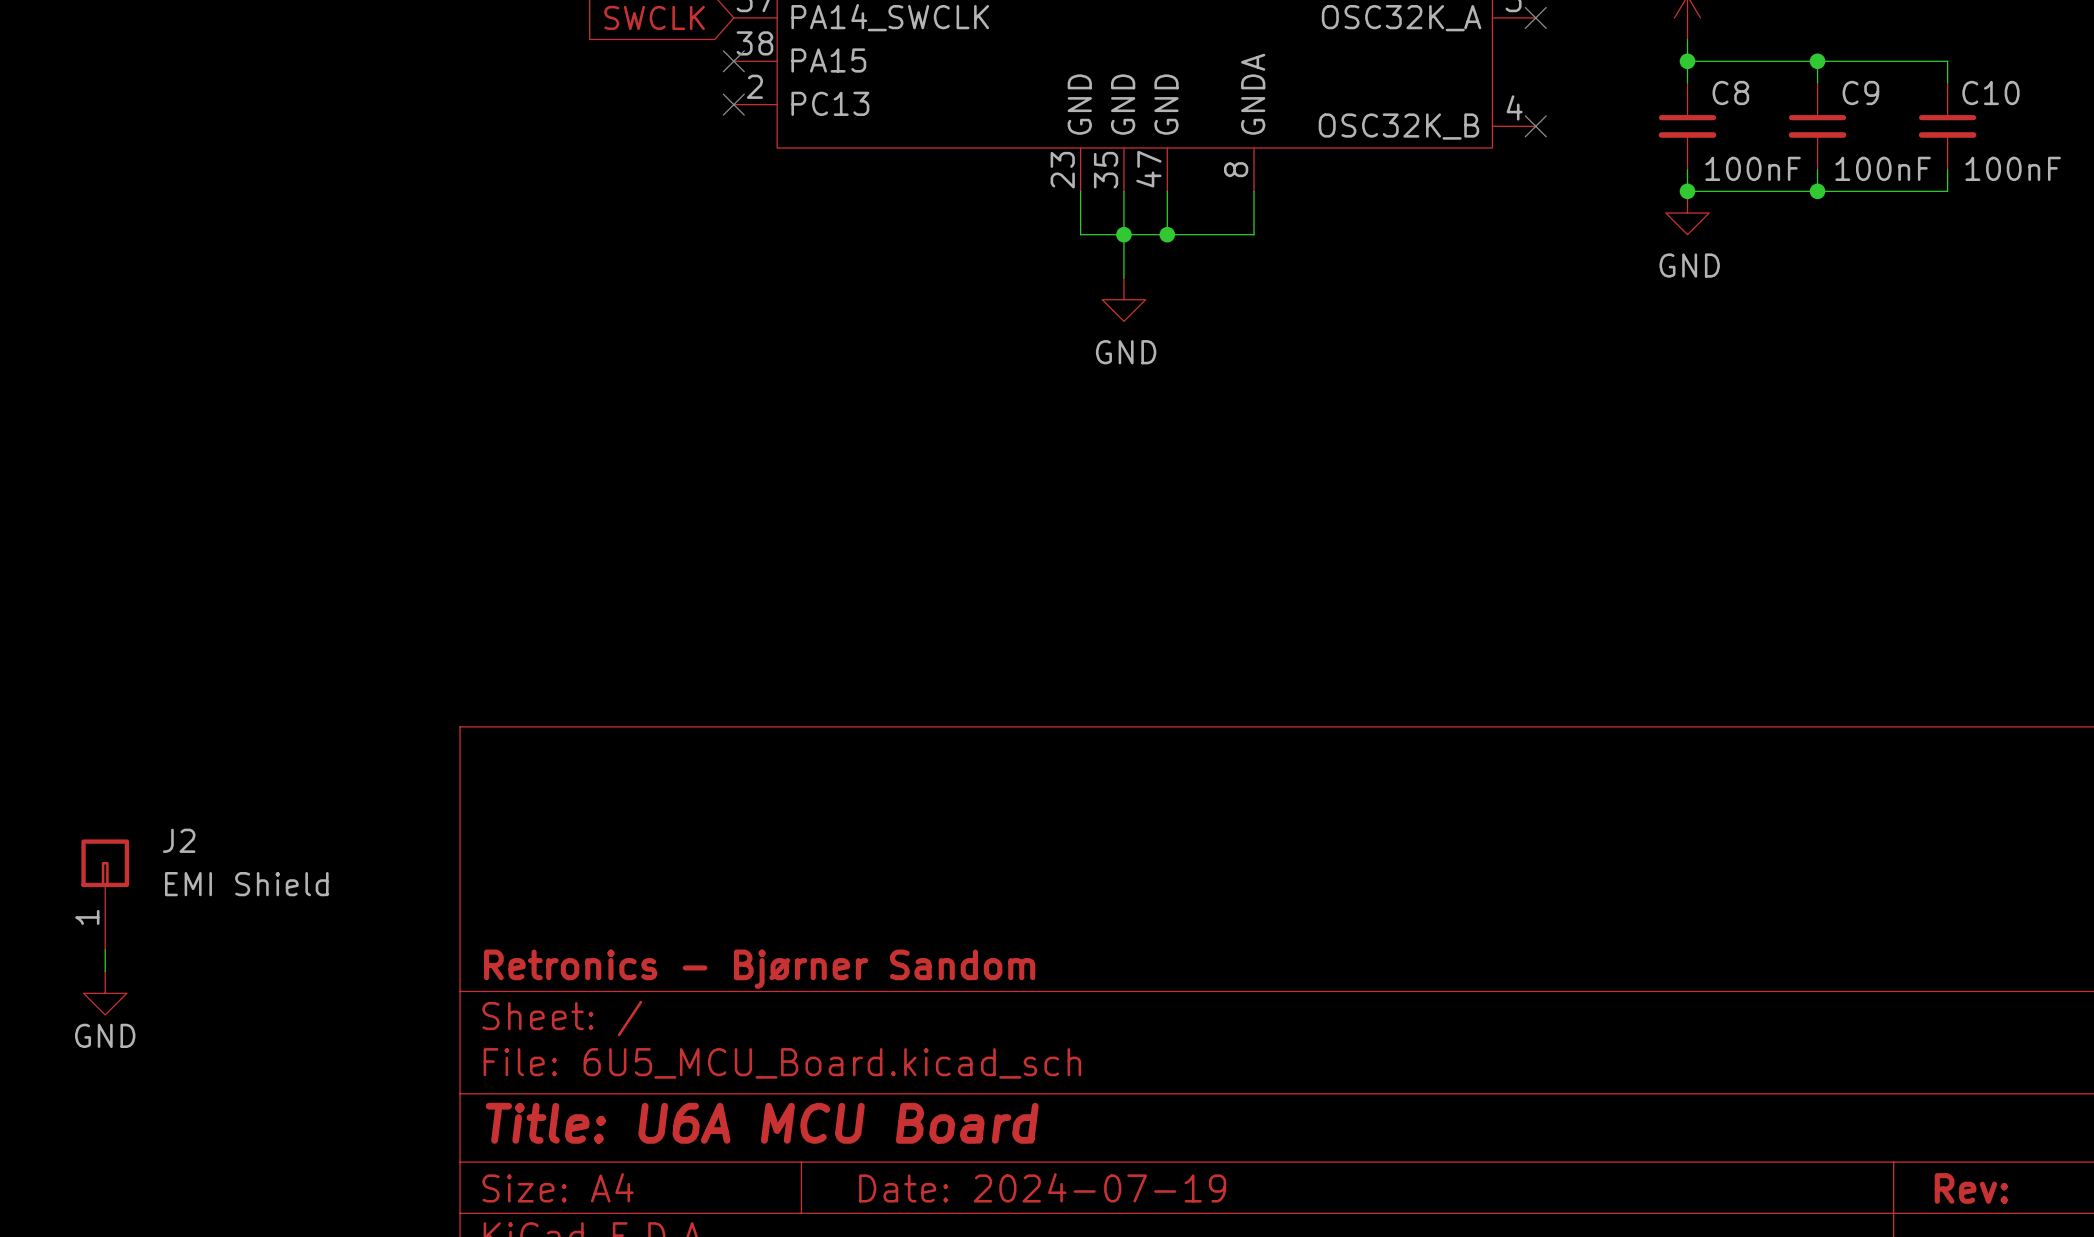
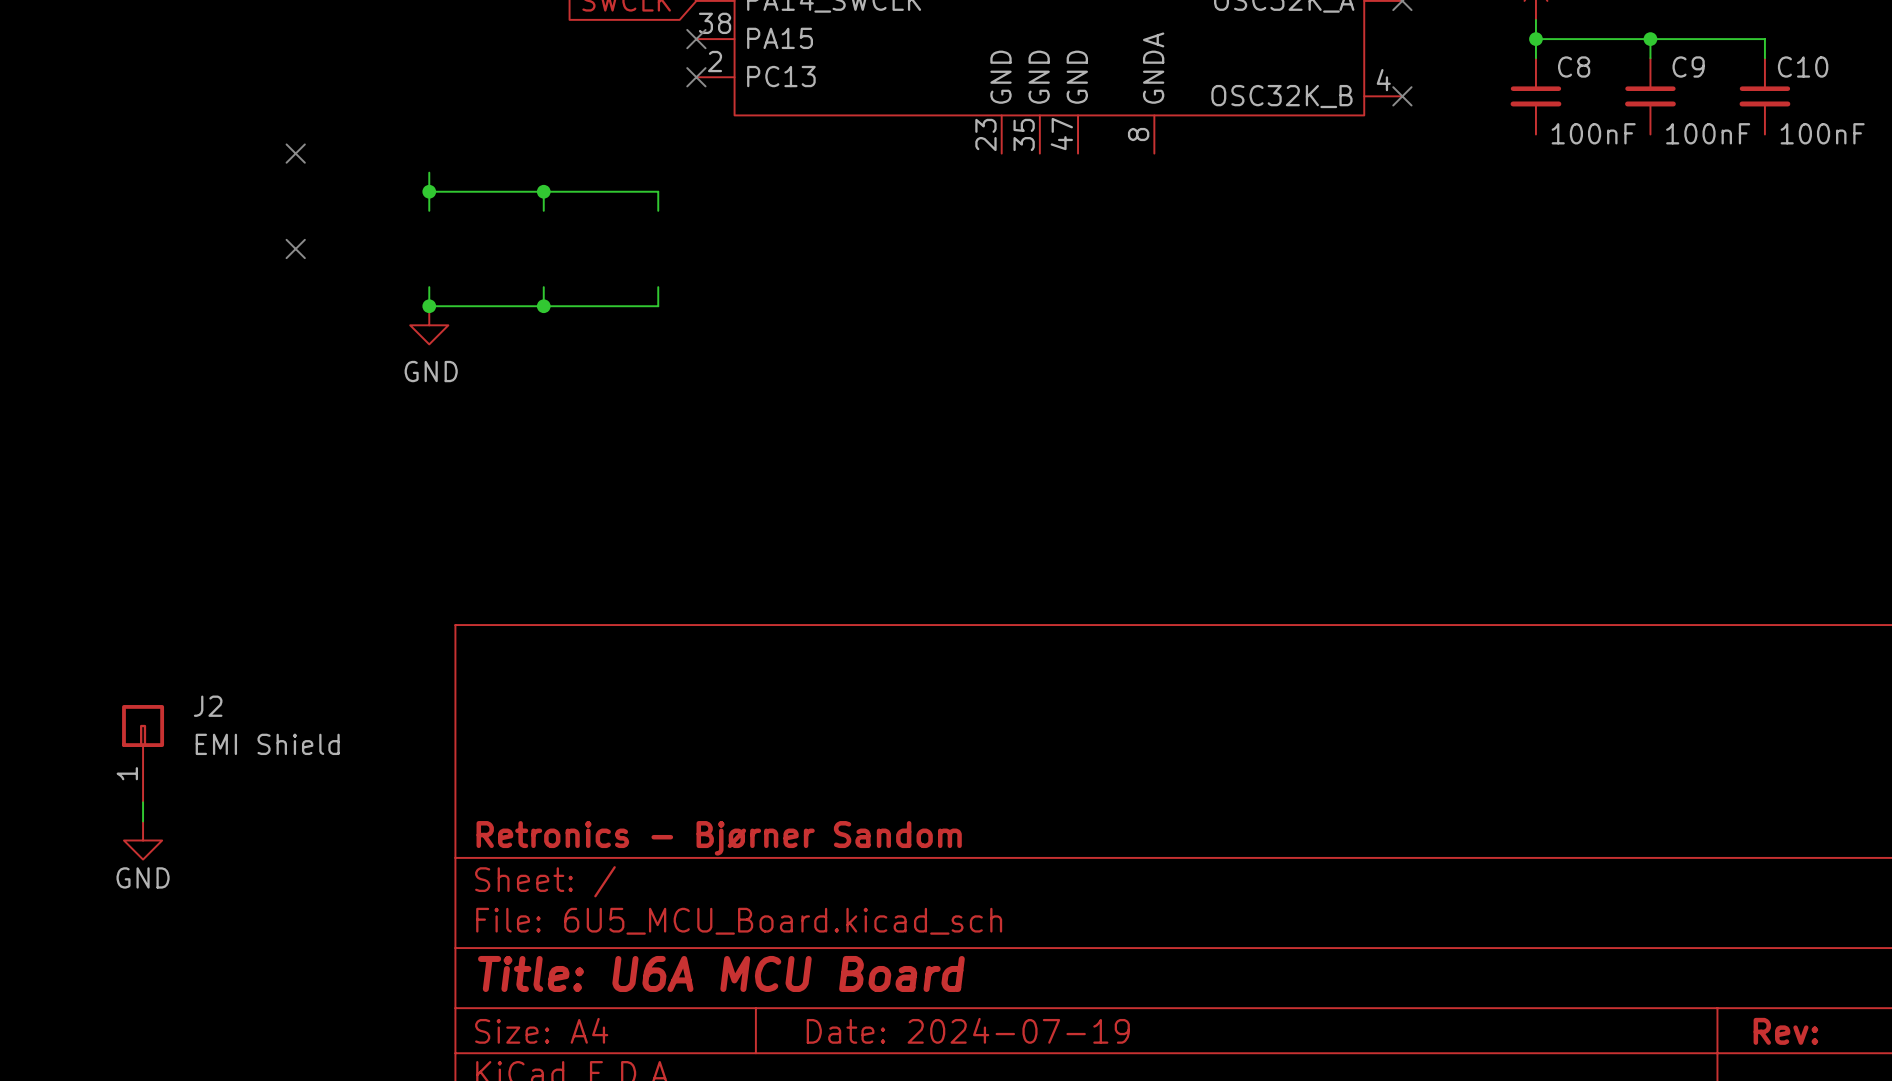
wire: (1687, 169) (1687, 191) (1947, 191) (1947, 169) -> none
wire: (1817, 169) (1817, 191) -> none
no-connect mark: none -> (295, 153)
wire: (1080, 191) (1080, 234) (1254, 234) (1254, 191) -> none
wire: (1123, 191) (1123, 278) -> none
wire: (1167, 191) (1167, 234) -> none
junction: (1687, 191) -> none
junction: (1817, 191) -> none
wire: none -> (429, 172) (429, 210)
power symbol: GND (1687, 213) -> none
wire: none -> (429, 191) (658, 191) (658, 210)
junction: none -> (429, 191)
wire: none -> (543, 191) (543, 210)
junction: none -> (543, 191)
junction: (1123, 234) -> none
junction: (1167, 234) -> none
no-connect mark: none -> (295, 248)
power symbol: GND (1123, 299) -> none
wire: none -> (429, 287) (429, 306) (658, 306) (658, 287)
wire: none -> (543, 287) (543, 306)
junction: none -> (429, 306)
junction: none -> (543, 306)
power symbol: none -> GND (429, 325)
J2 position: (105, 894) -> (143, 753)
power symbol position: GND (105, 993) -> GND (143, 840)

